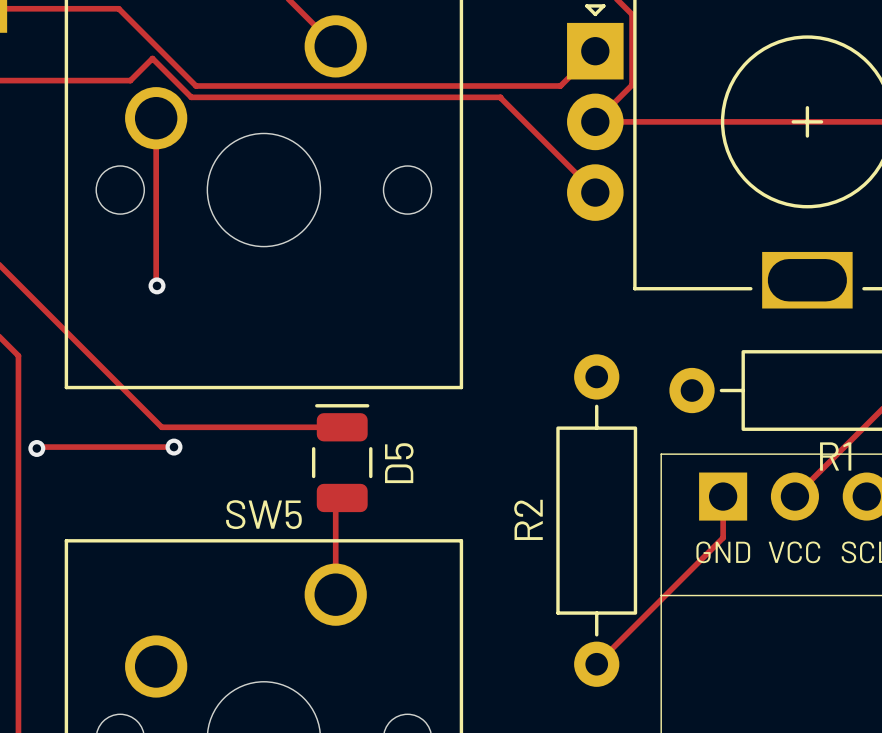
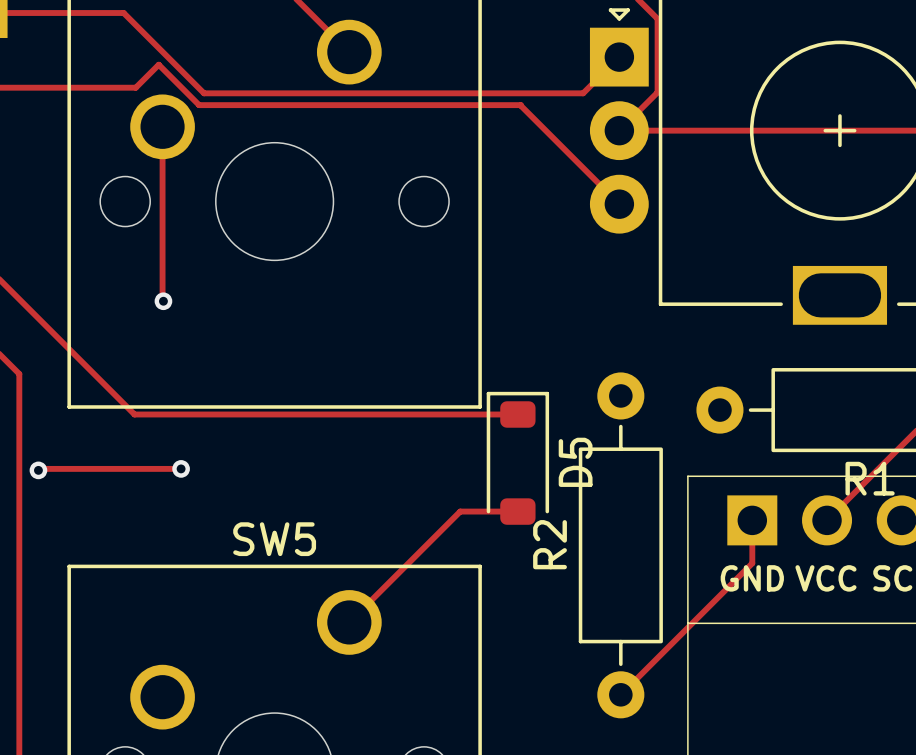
track: (129, 394) (161, 427) (342, 427) -> (134, 414) (517, 414)
D5 footprint: [311, 404, 373, 513] -> [486, 391, 550, 525]
track: (342, 497) (335, 504) (335, 594) -> (517, 511) (460, 511) (349, 622)

